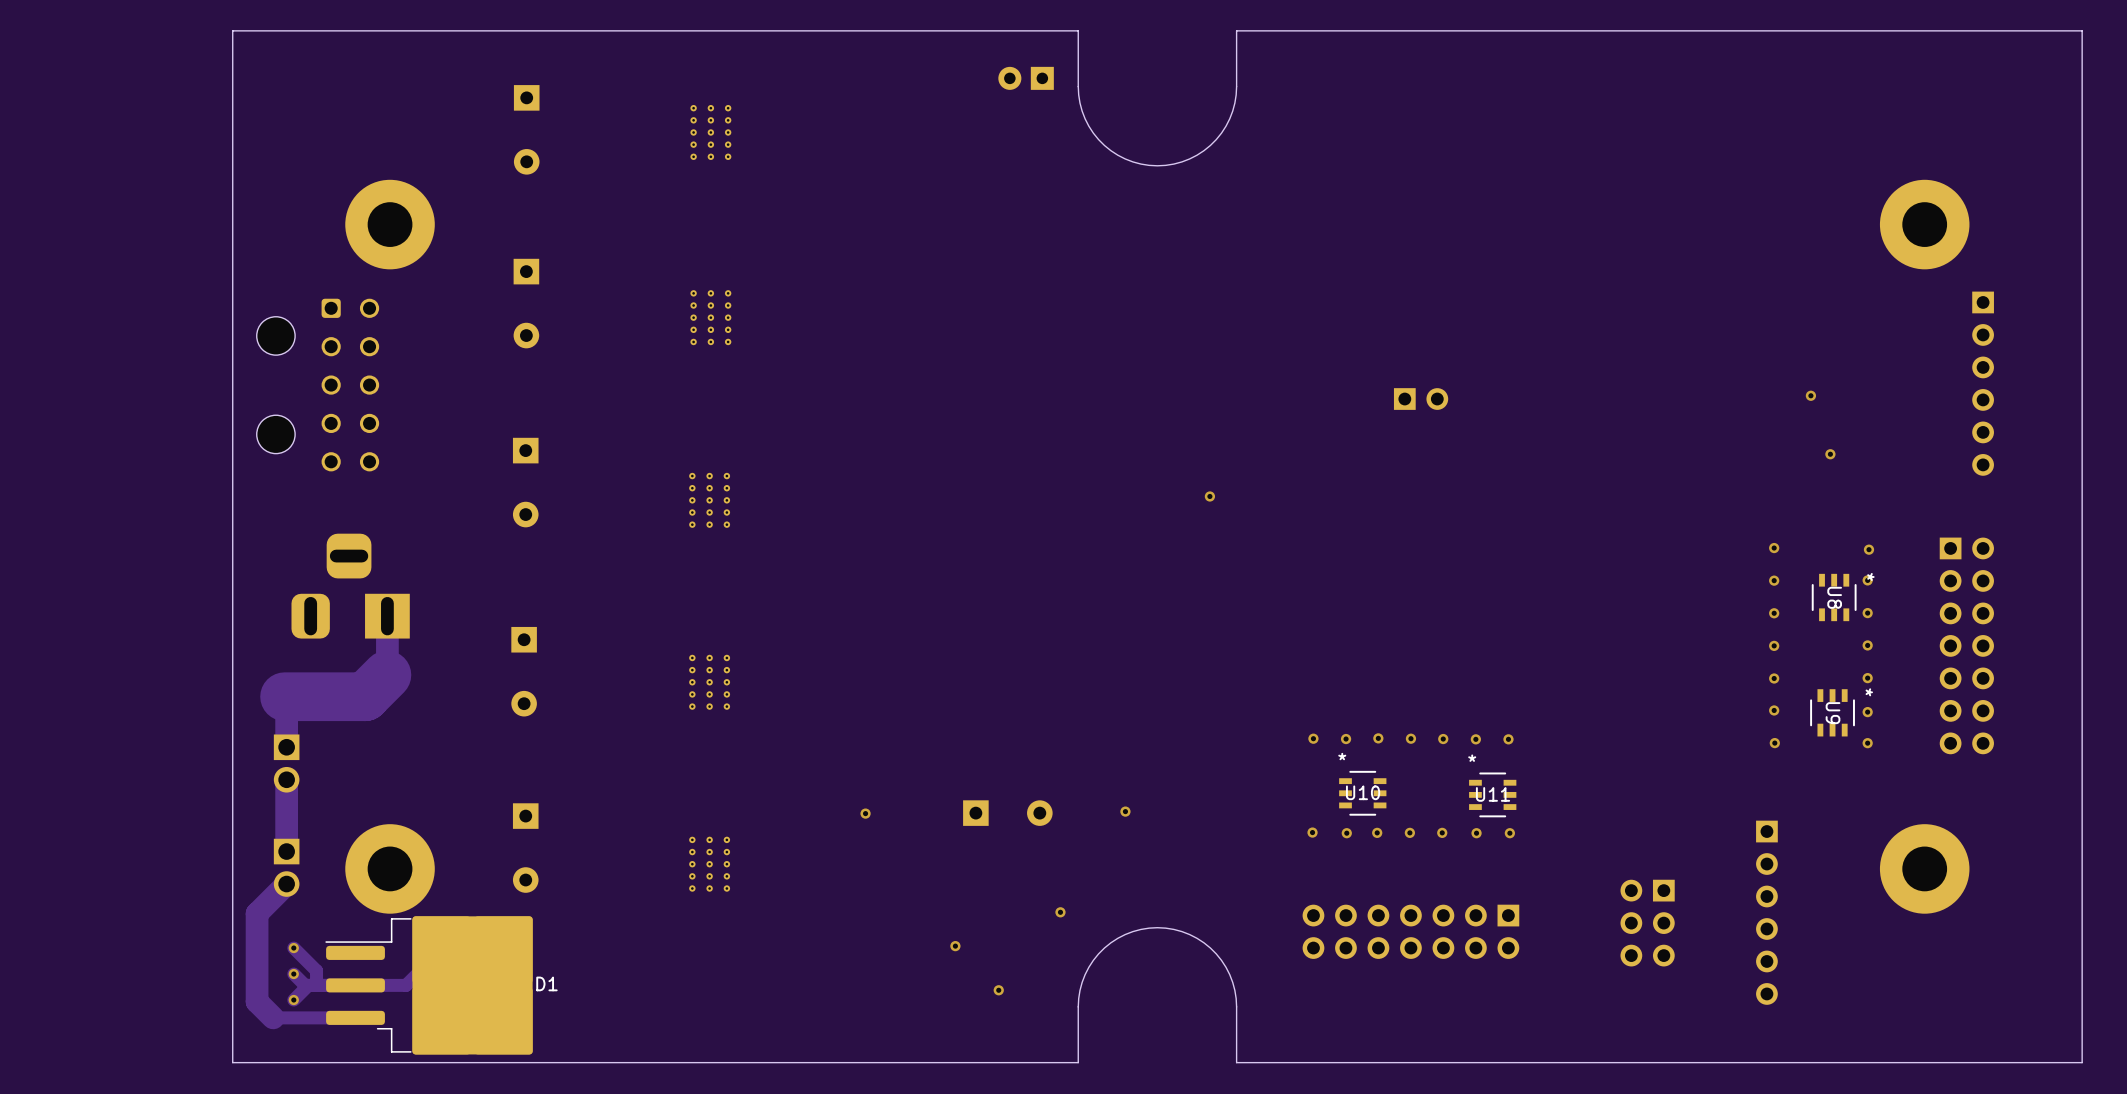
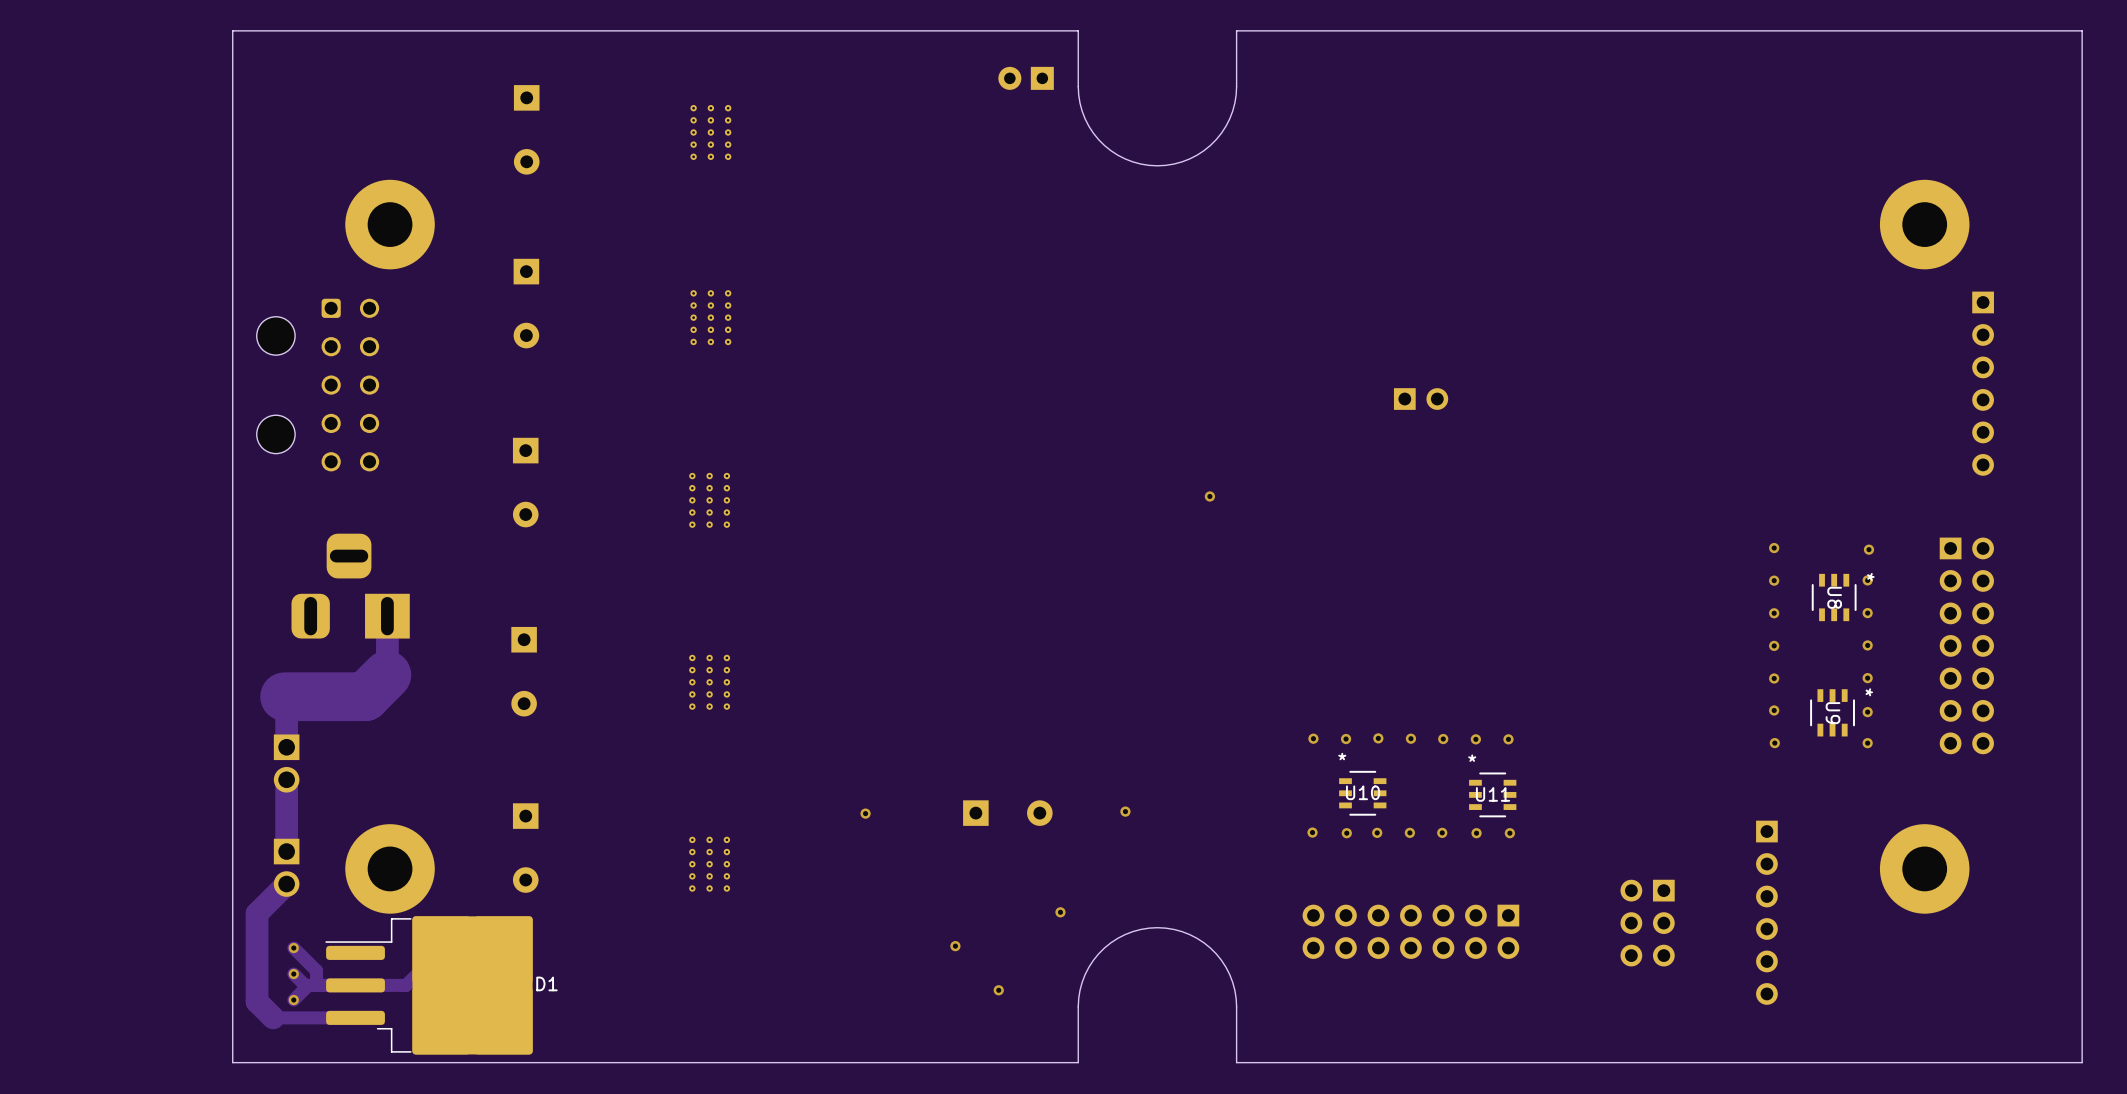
via: (1810, 395) -> none
via: (1830, 454) -> none

